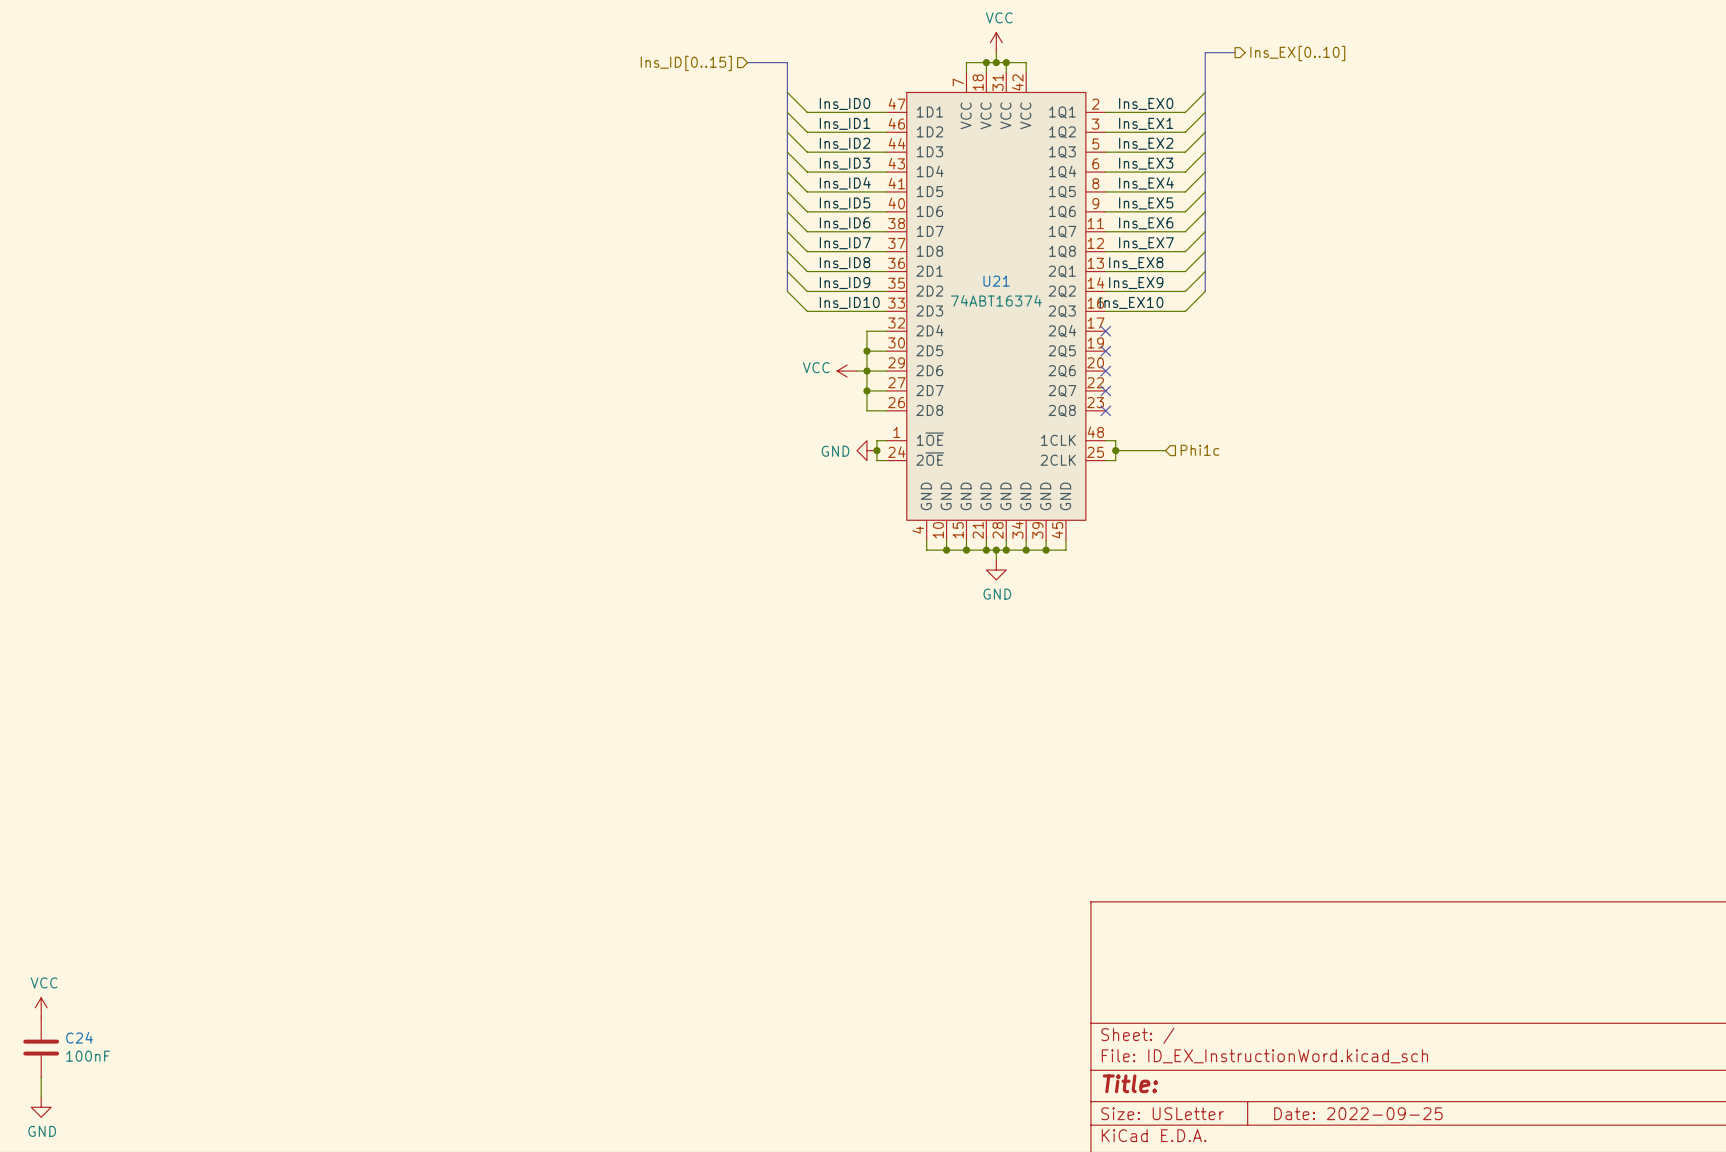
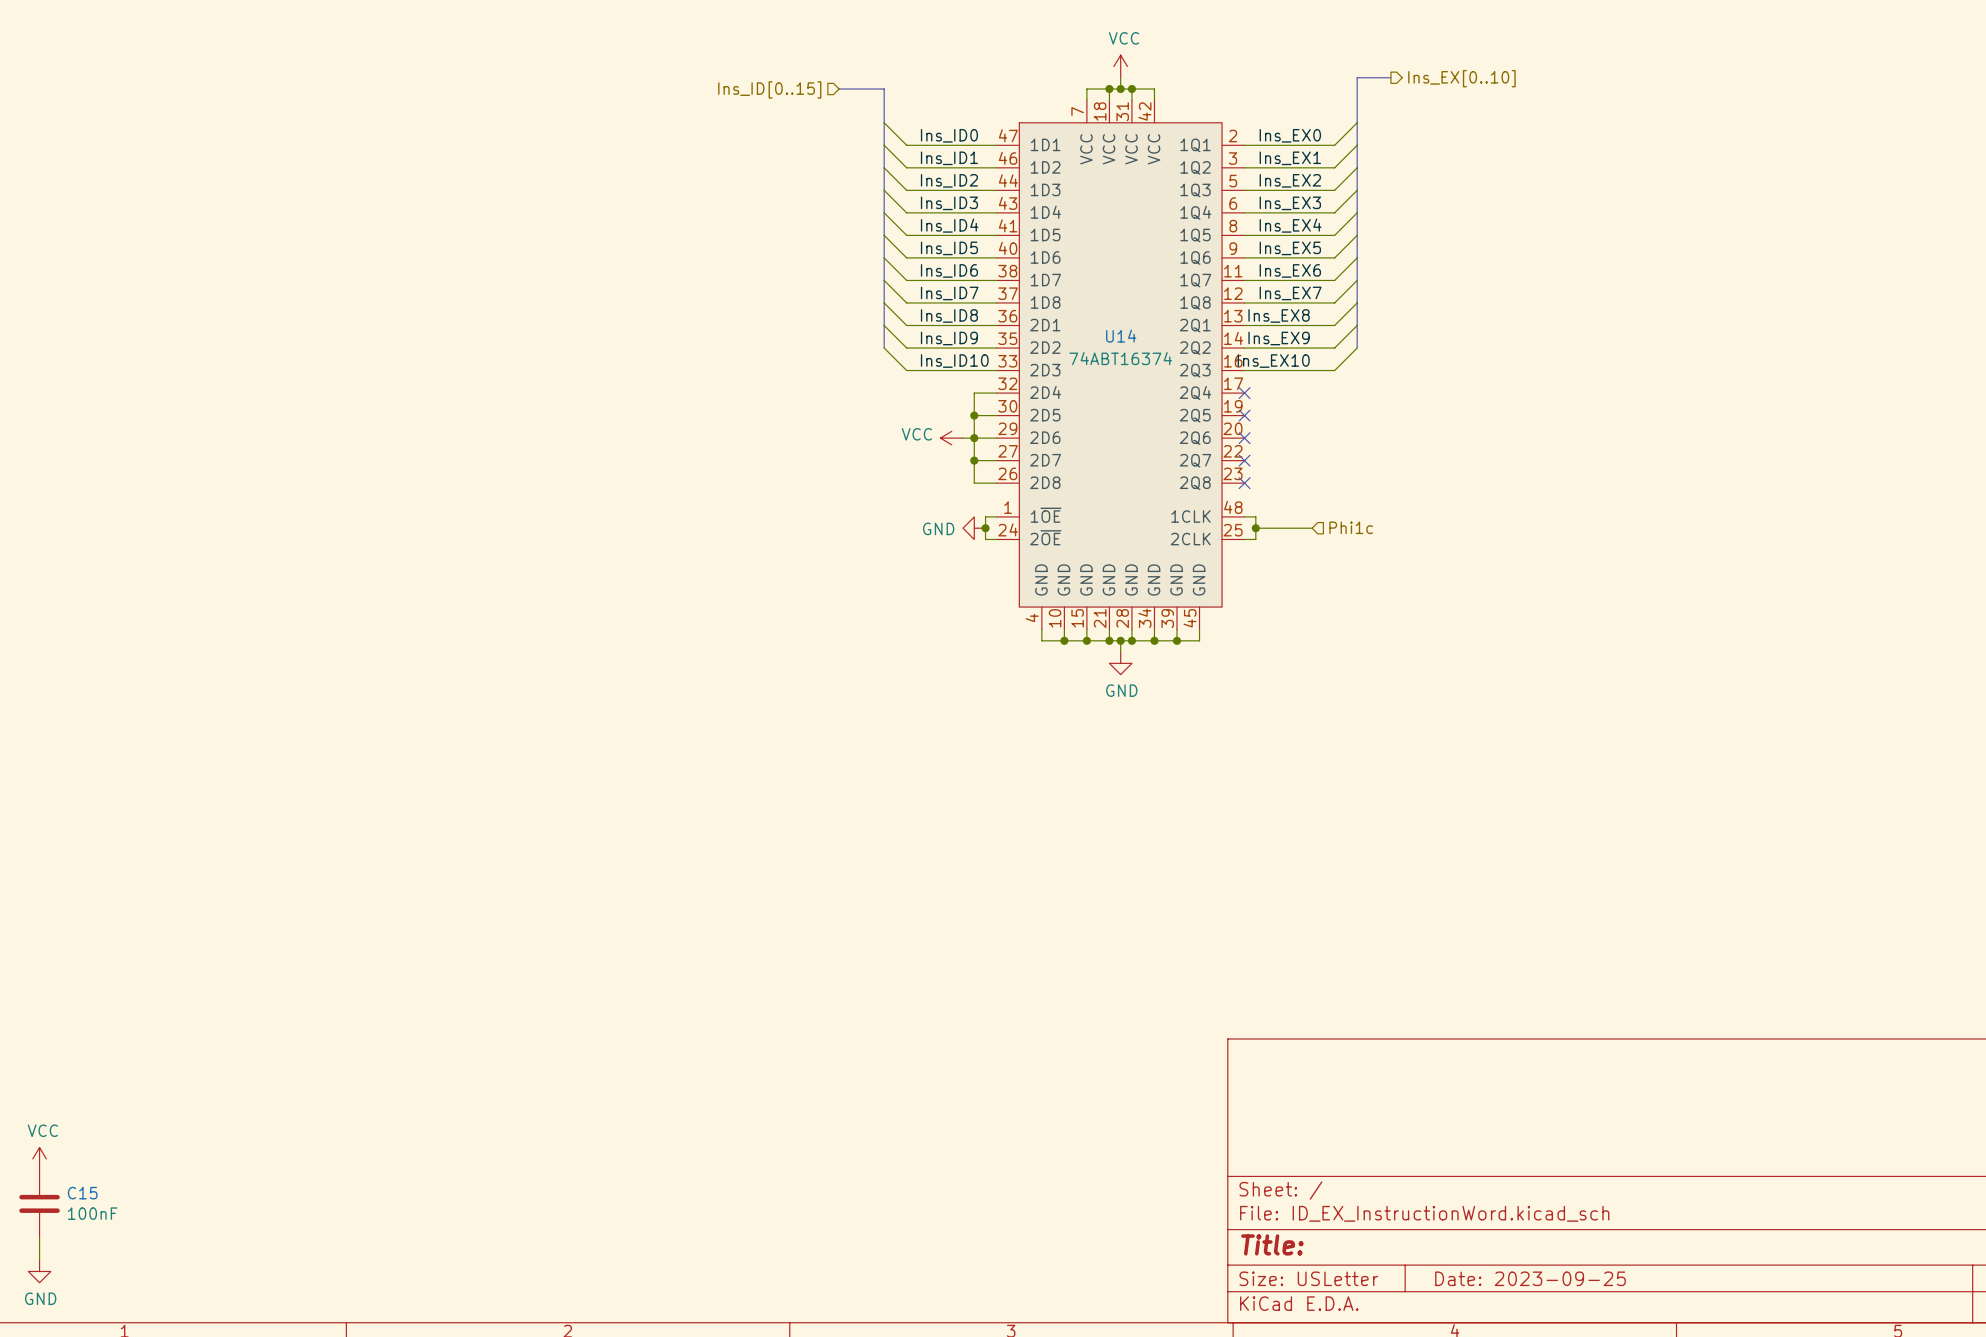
U21 name: U21 (996, 281) -> U14 (1121, 336)
C24 name: C24 (79, 1037) -> C15 (82, 1193)
title block: Date: 2022-09-25 (1358, 1113) -> Date: 2023-09-25 (1530, 1278)

